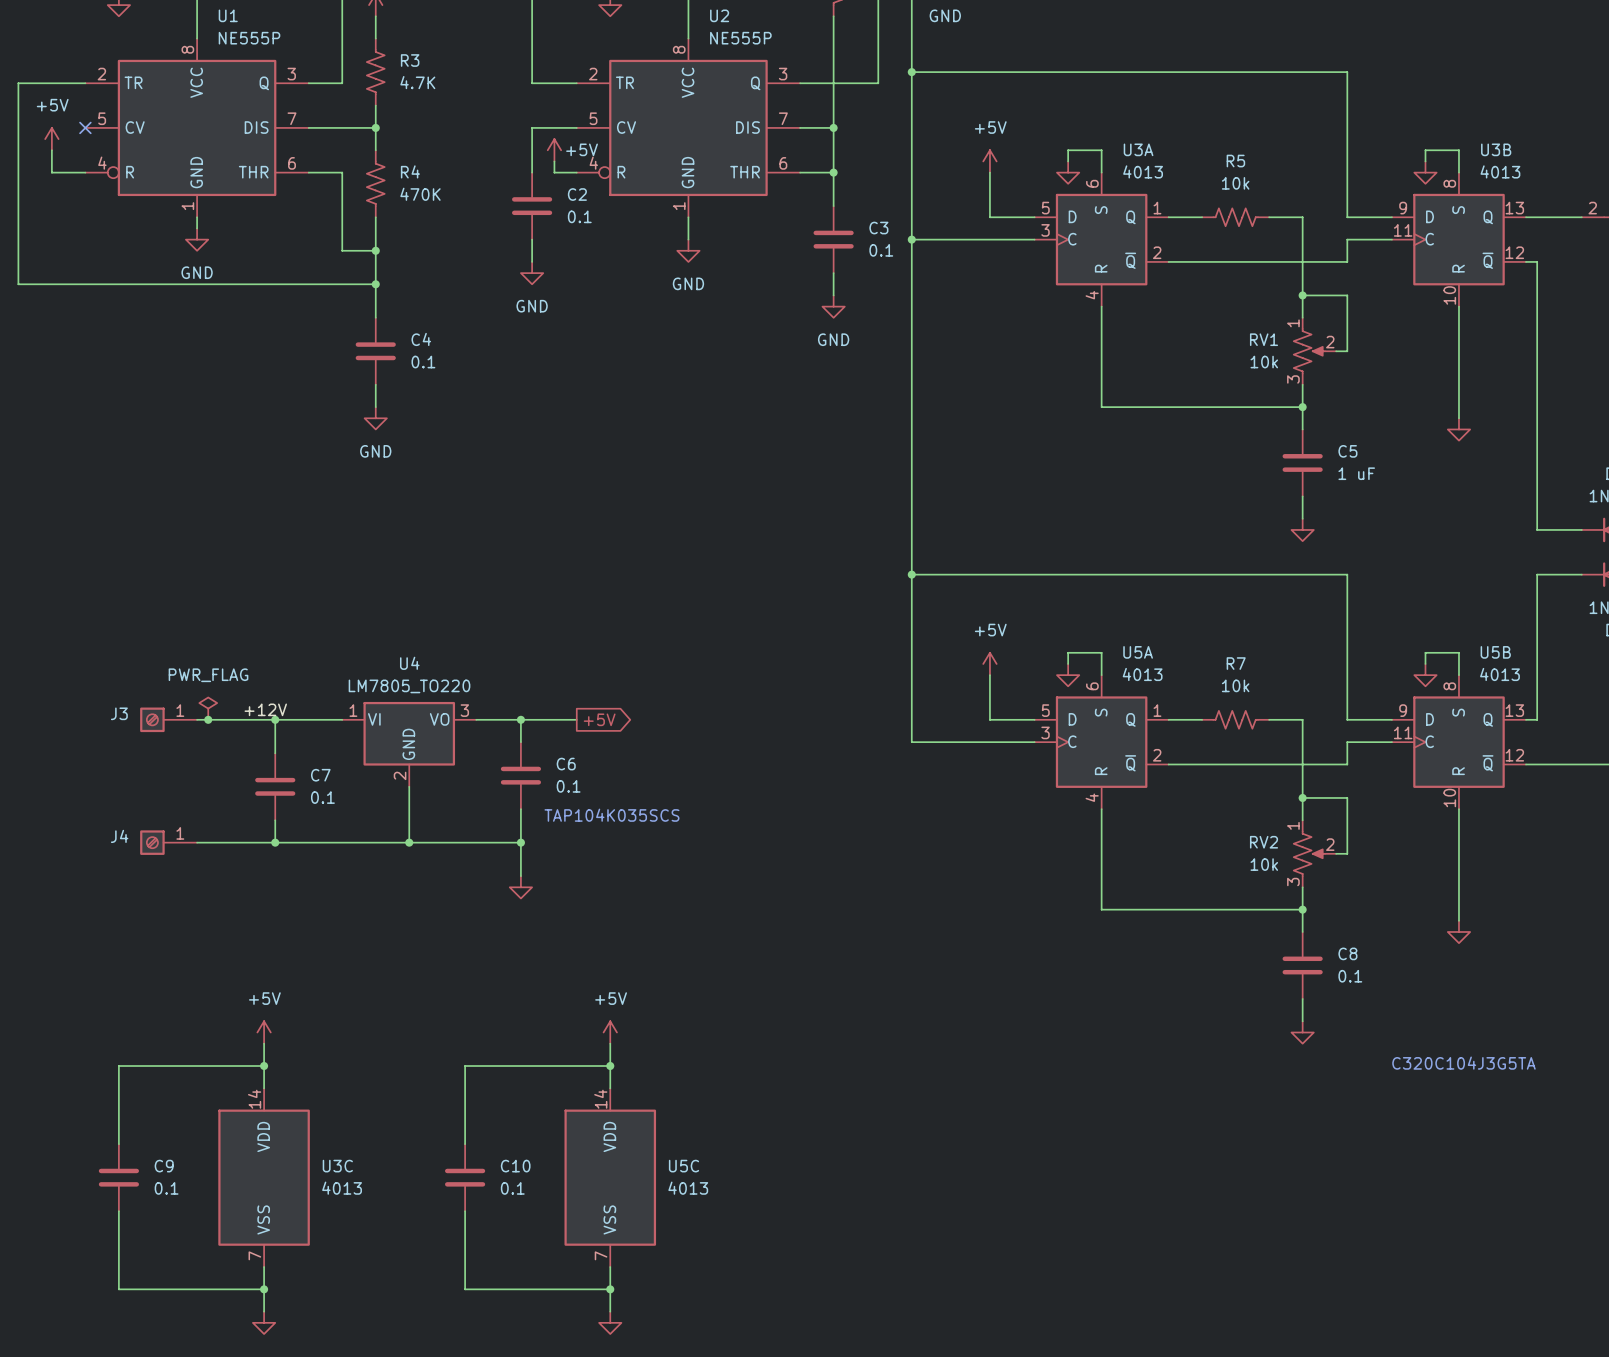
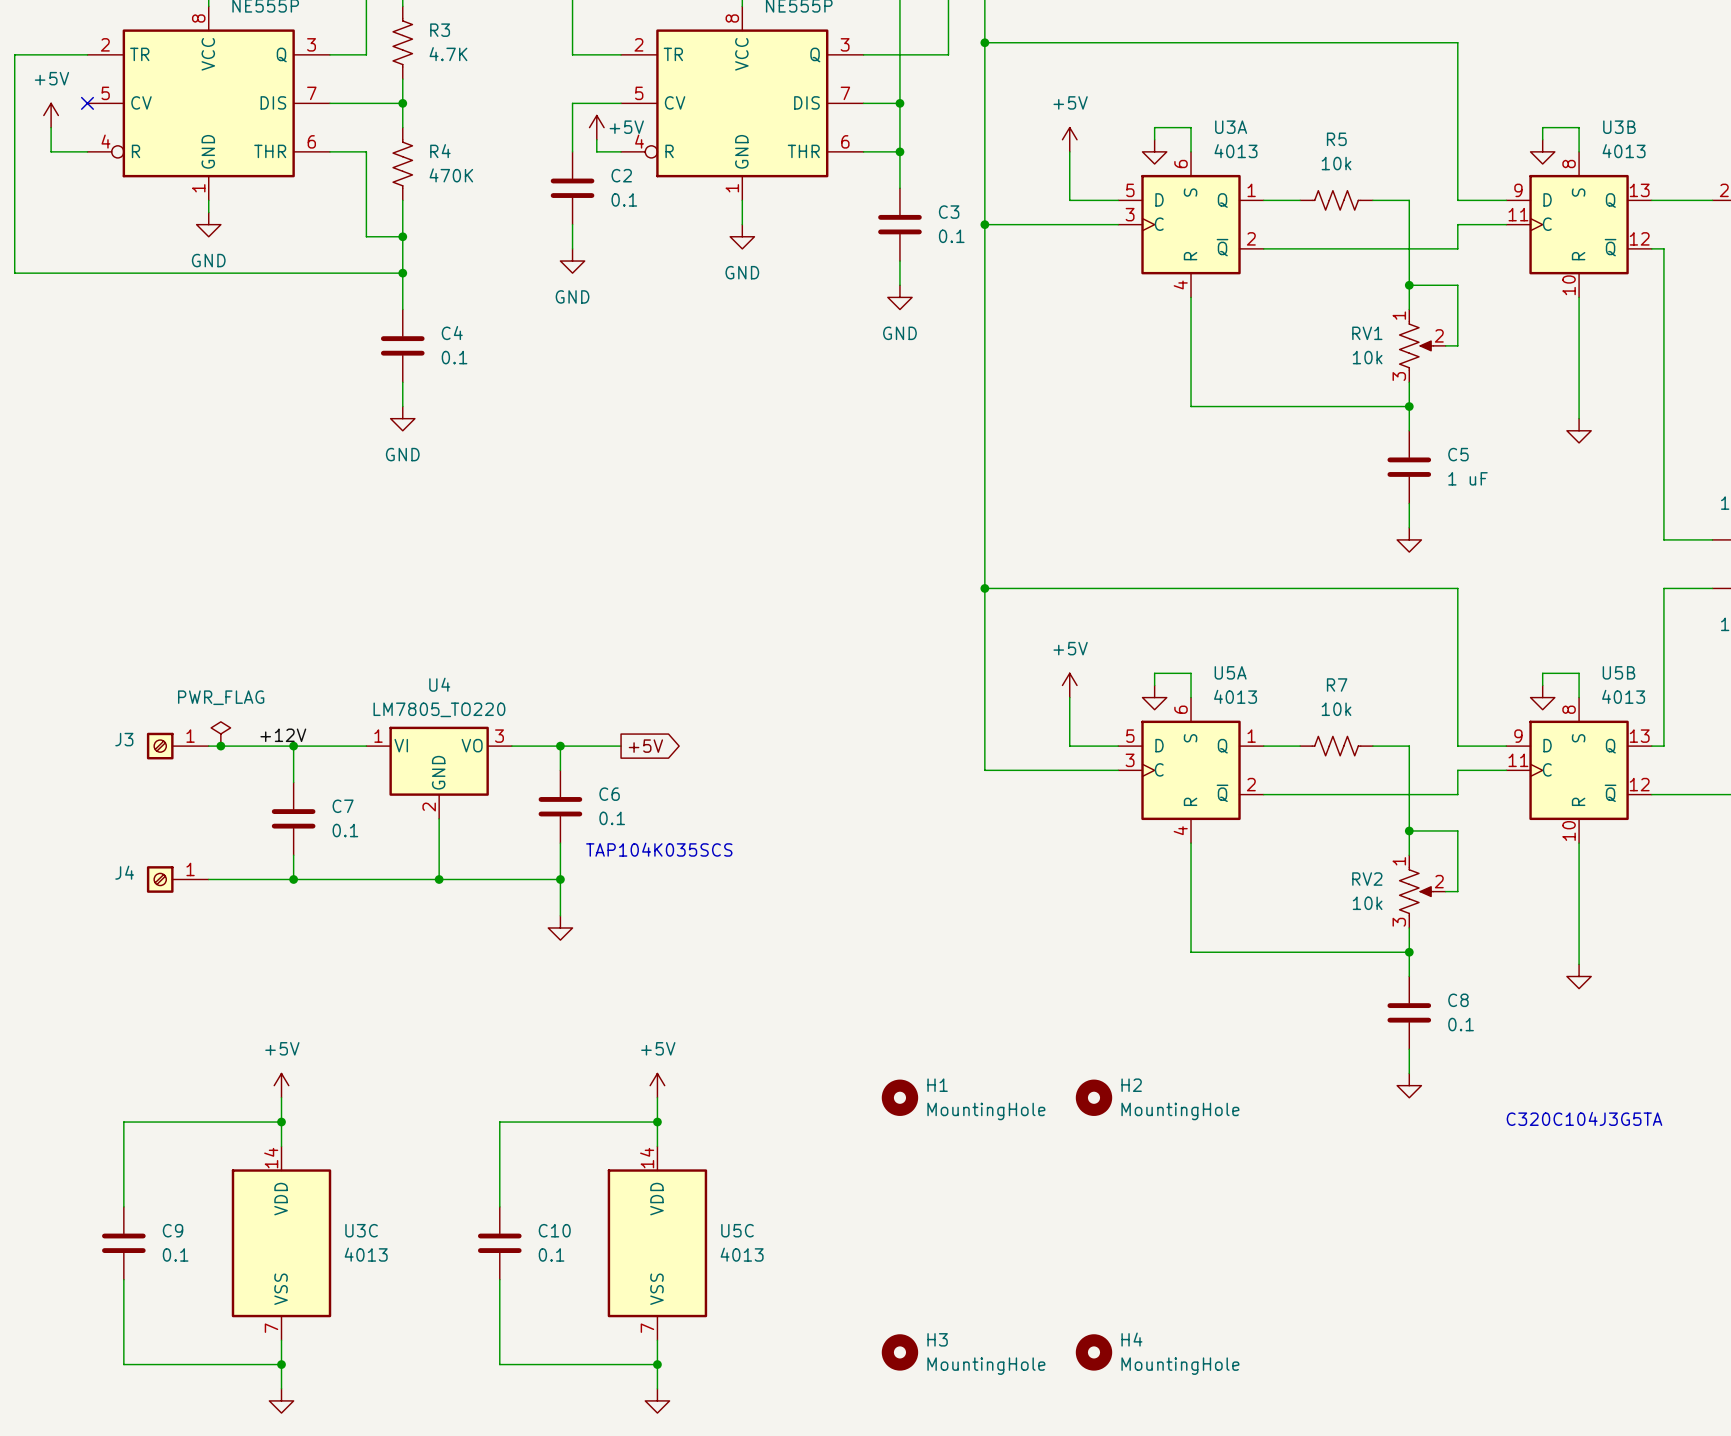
H1: none -> MountingHole (899, 1097)
H2: none -> MountingHole (1093, 1097)
H3: none -> MountingHole (899, 1352)
H4: none -> MountingHole (1093, 1352)

